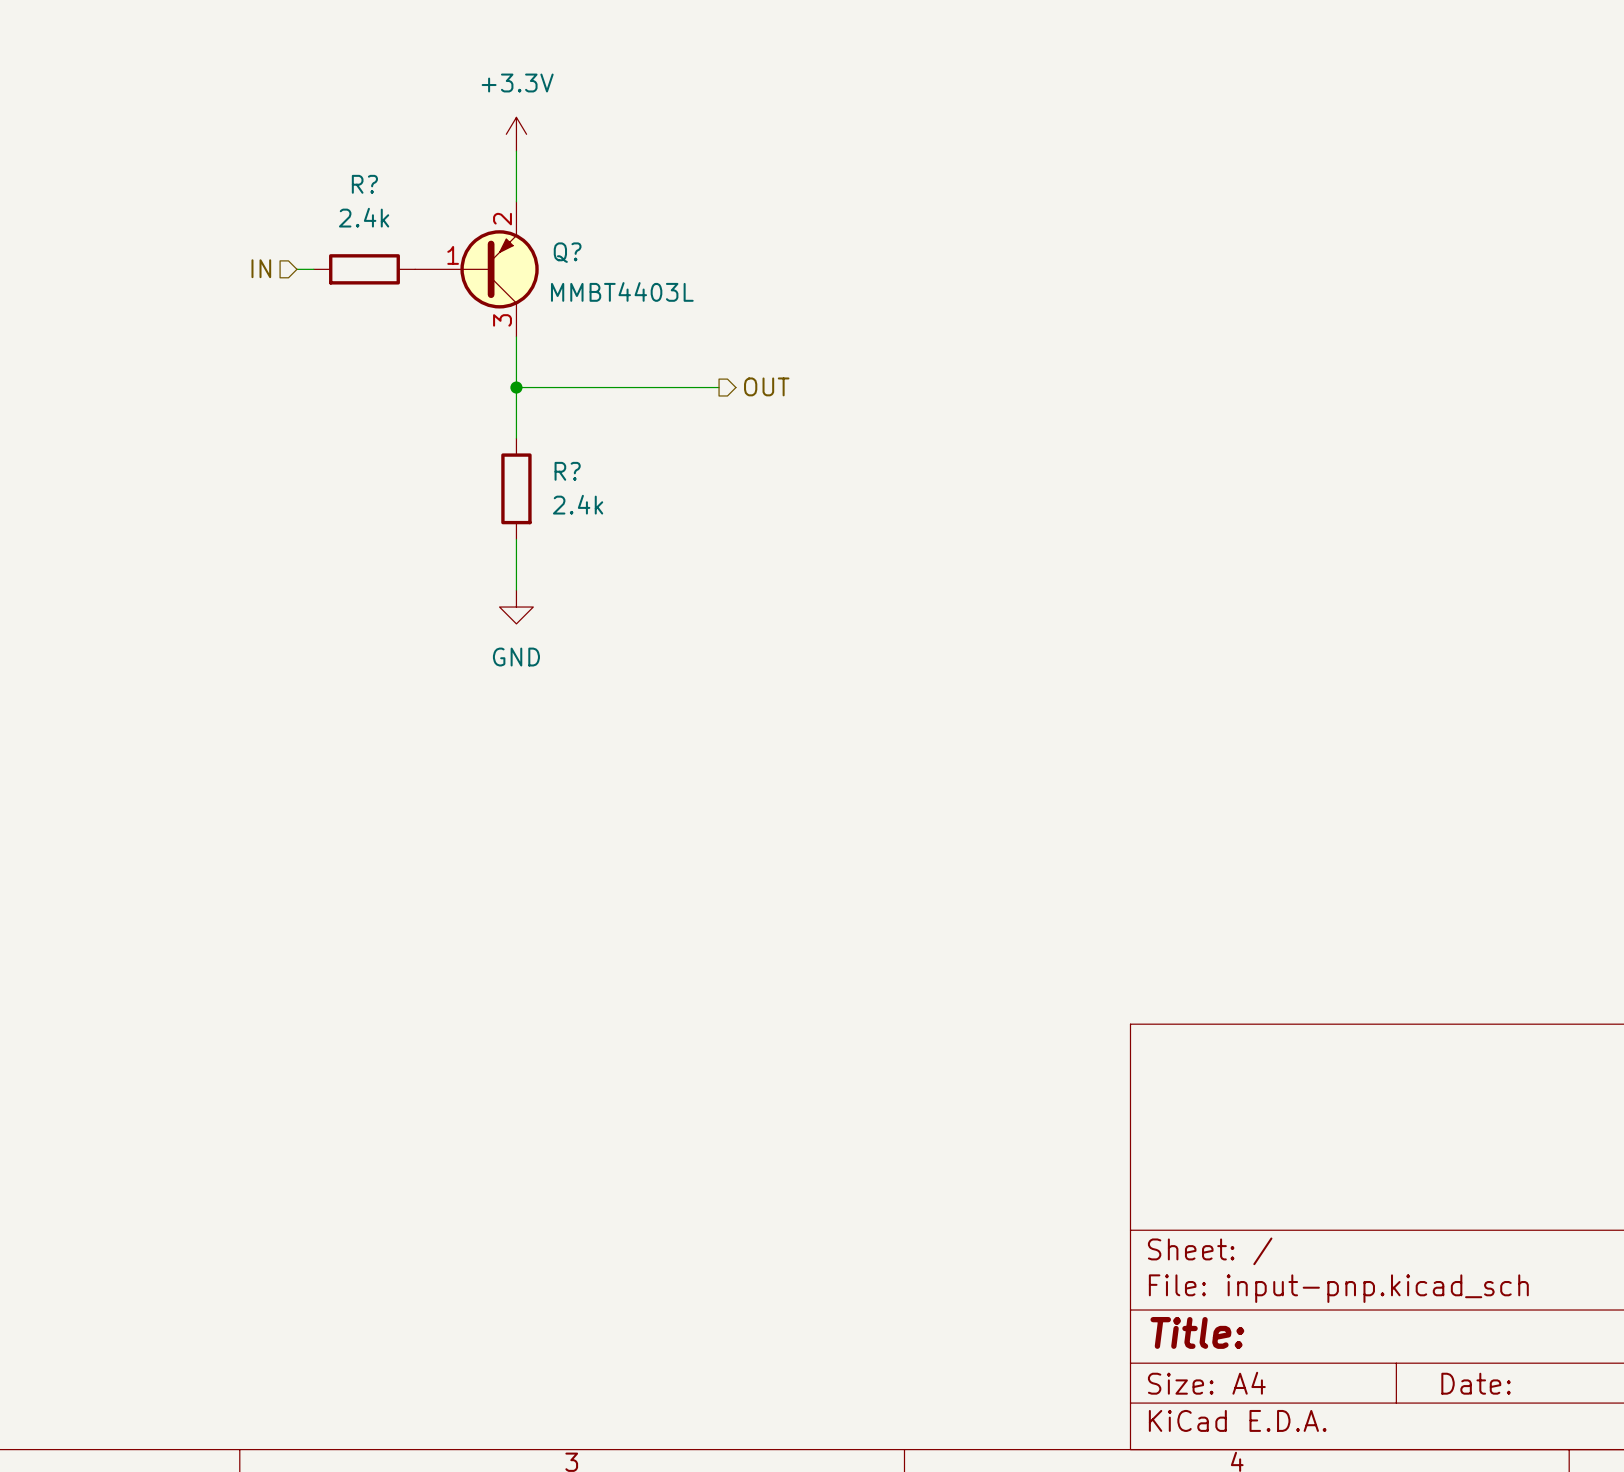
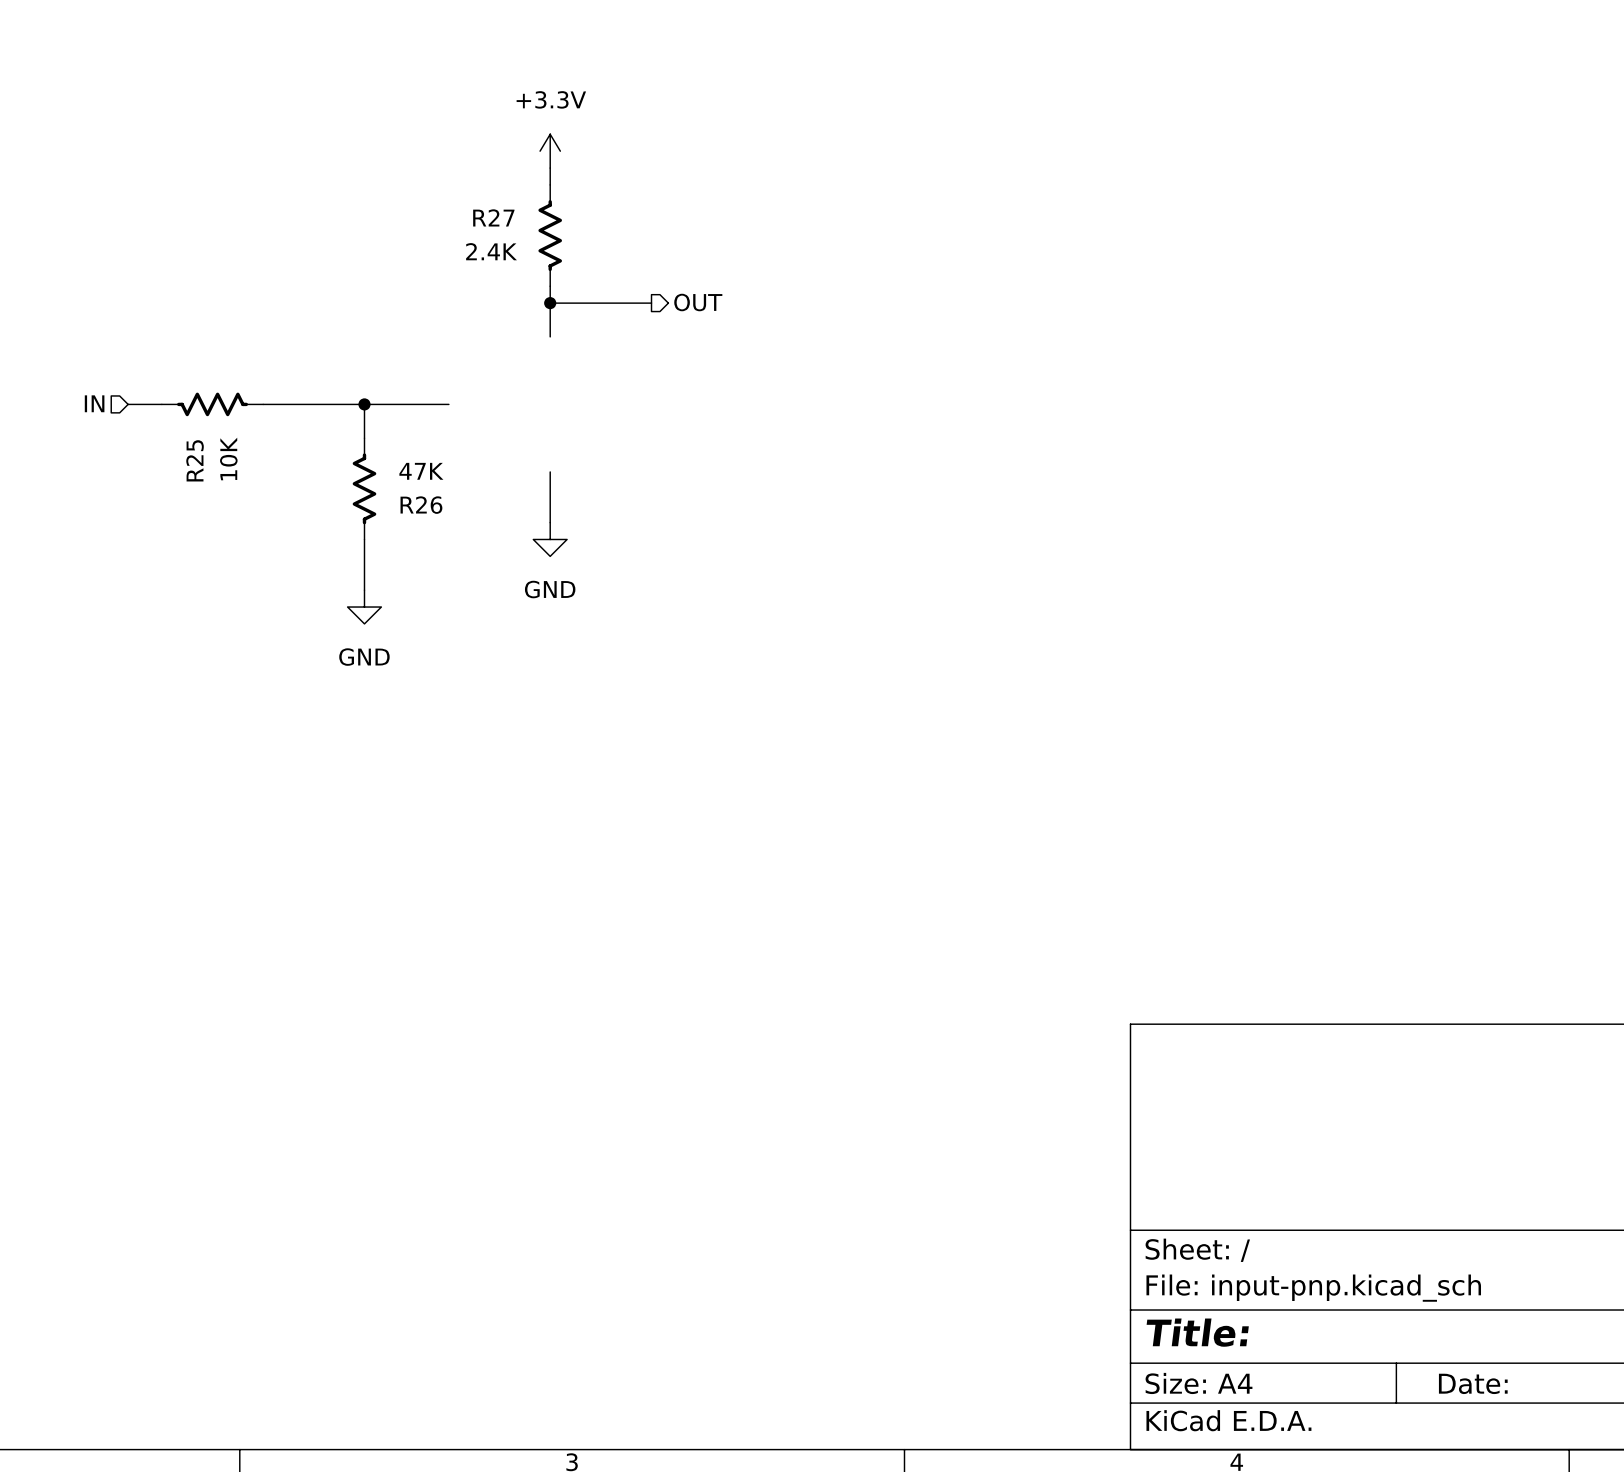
power symbol position: +3.3V (516, 134) -> +3.3V (550, 151)
wire: (516, 151) (516, 201) -> (550, 286) (550, 336)
wire: none -> (550, 168) (550, 184)
R27: none -> 2.4K (550, 235)
hierarchical label position: IN (261, 268) -> IN (94, 403)
wire: (296, 269) (313, 269) -> none
R?: 2.4k (364, 269) -> none
Q?: (476, 269) -> none
wire: none -> (550, 303) (651, 303)
junction: none -> (550, 303)
wire: (516, 336) (516, 438) -> none
hierarchical label position: OUT (766, 386) -> OUT (698, 302)
wire: (516, 387) (719, 387) -> none
junction: (516, 387) -> none
wire: none -> (128, 404) (161, 404)
R25: none -> 10K (212, 404)
wire: none -> (263, 404) (448, 404)
wire: none -> (364, 404) (364, 438)
junction: none -> (364, 404)
R26: none -> 47K (364, 488)
R?: 2.4k (516, 488) -> none
wire: none -> (364, 539) (364, 590)
wire: (516, 539) (516, 590) -> (550, 471) (550, 522)
power symbol: none -> GND (364, 607)
power symbol position: GND (516, 607) -> GND (550, 539)

